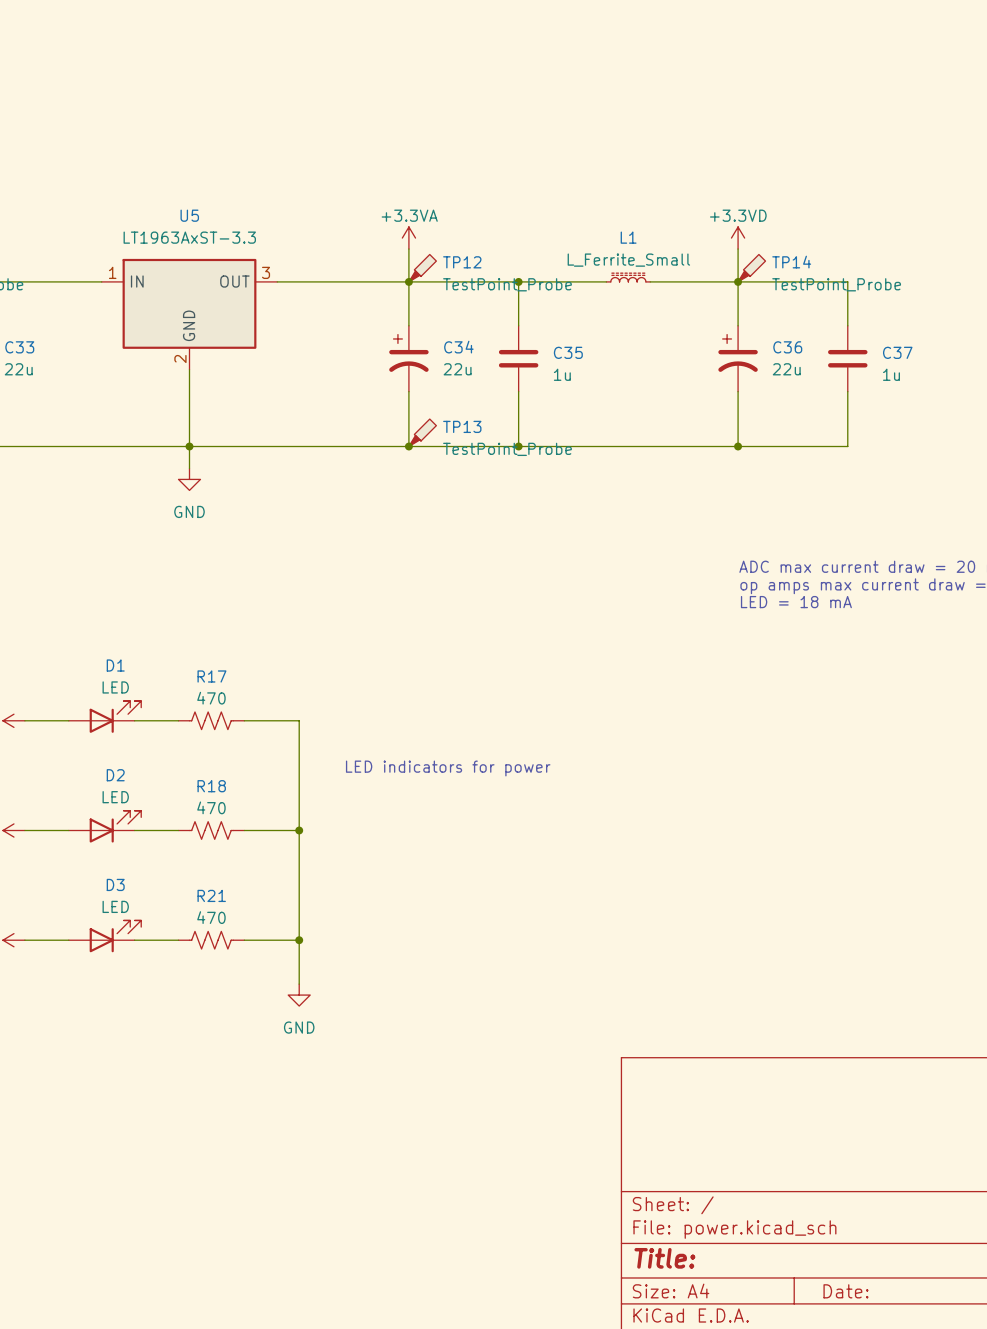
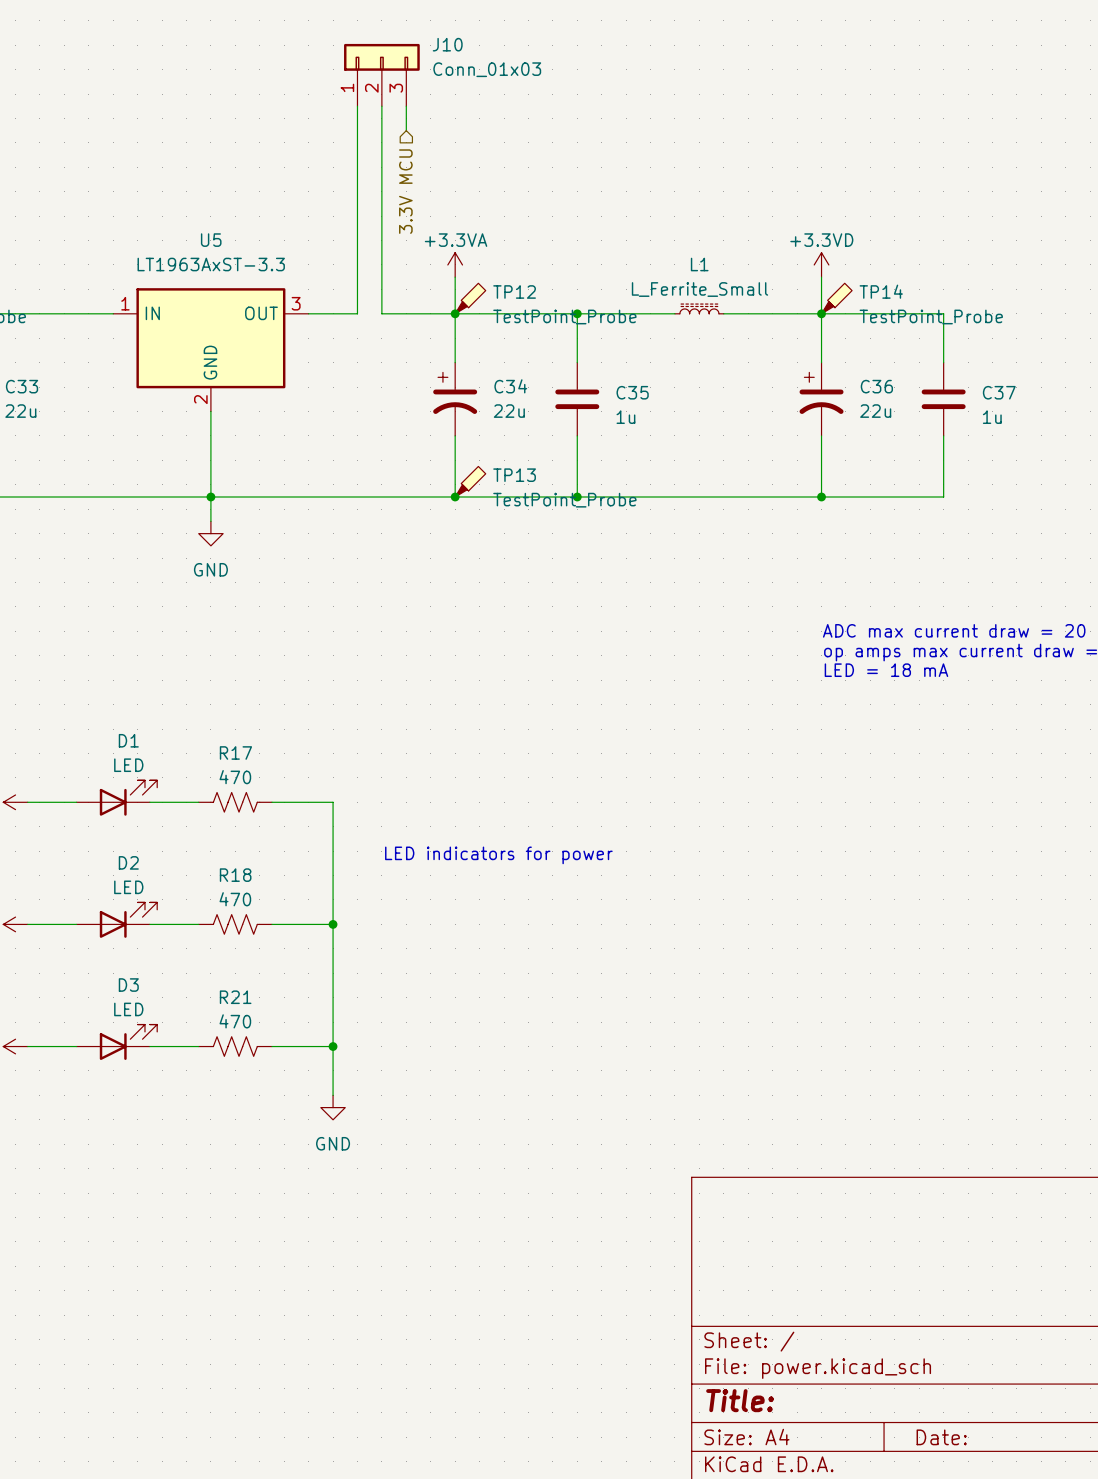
J10: none -> Conn_01x03 (381, 75)
wire: none -> (381, 106) (381, 313)
wire: none -> (406, 106) (406, 130)
hierarchical label: none -> 3.3V MCU (405, 191)
wire: (321, 281) (343, 281) -> (357, 313) (357, 106)

